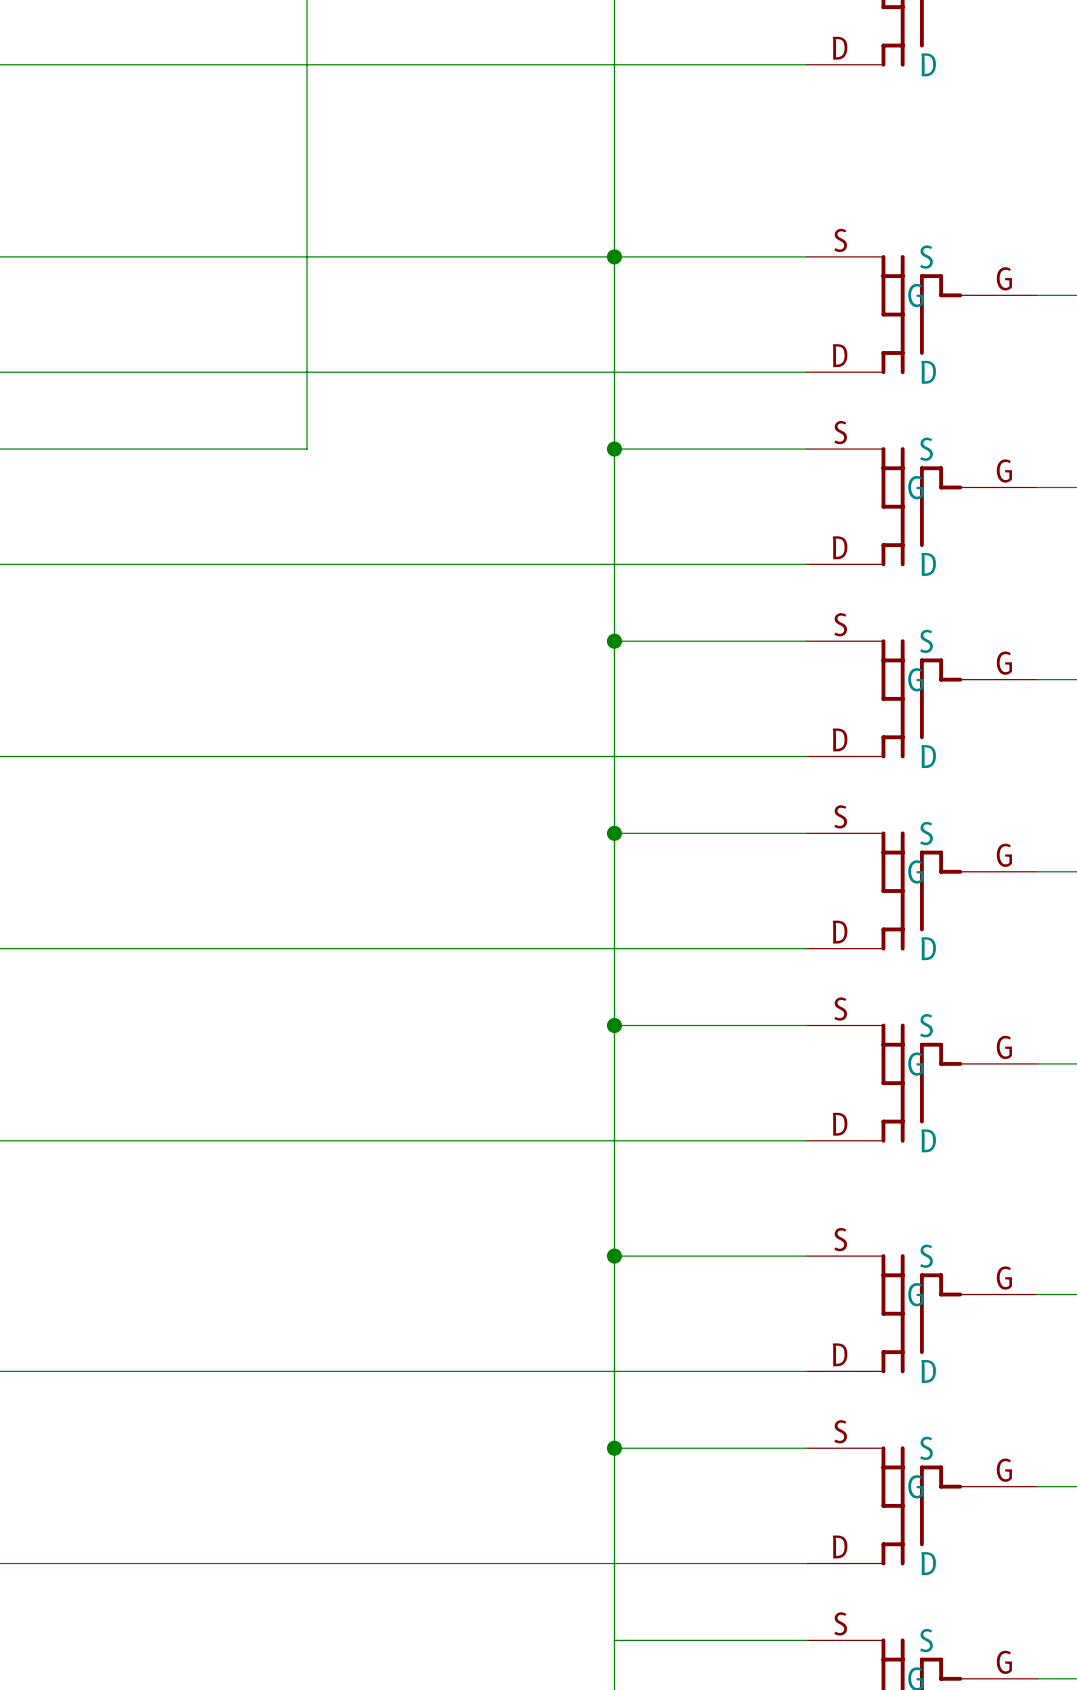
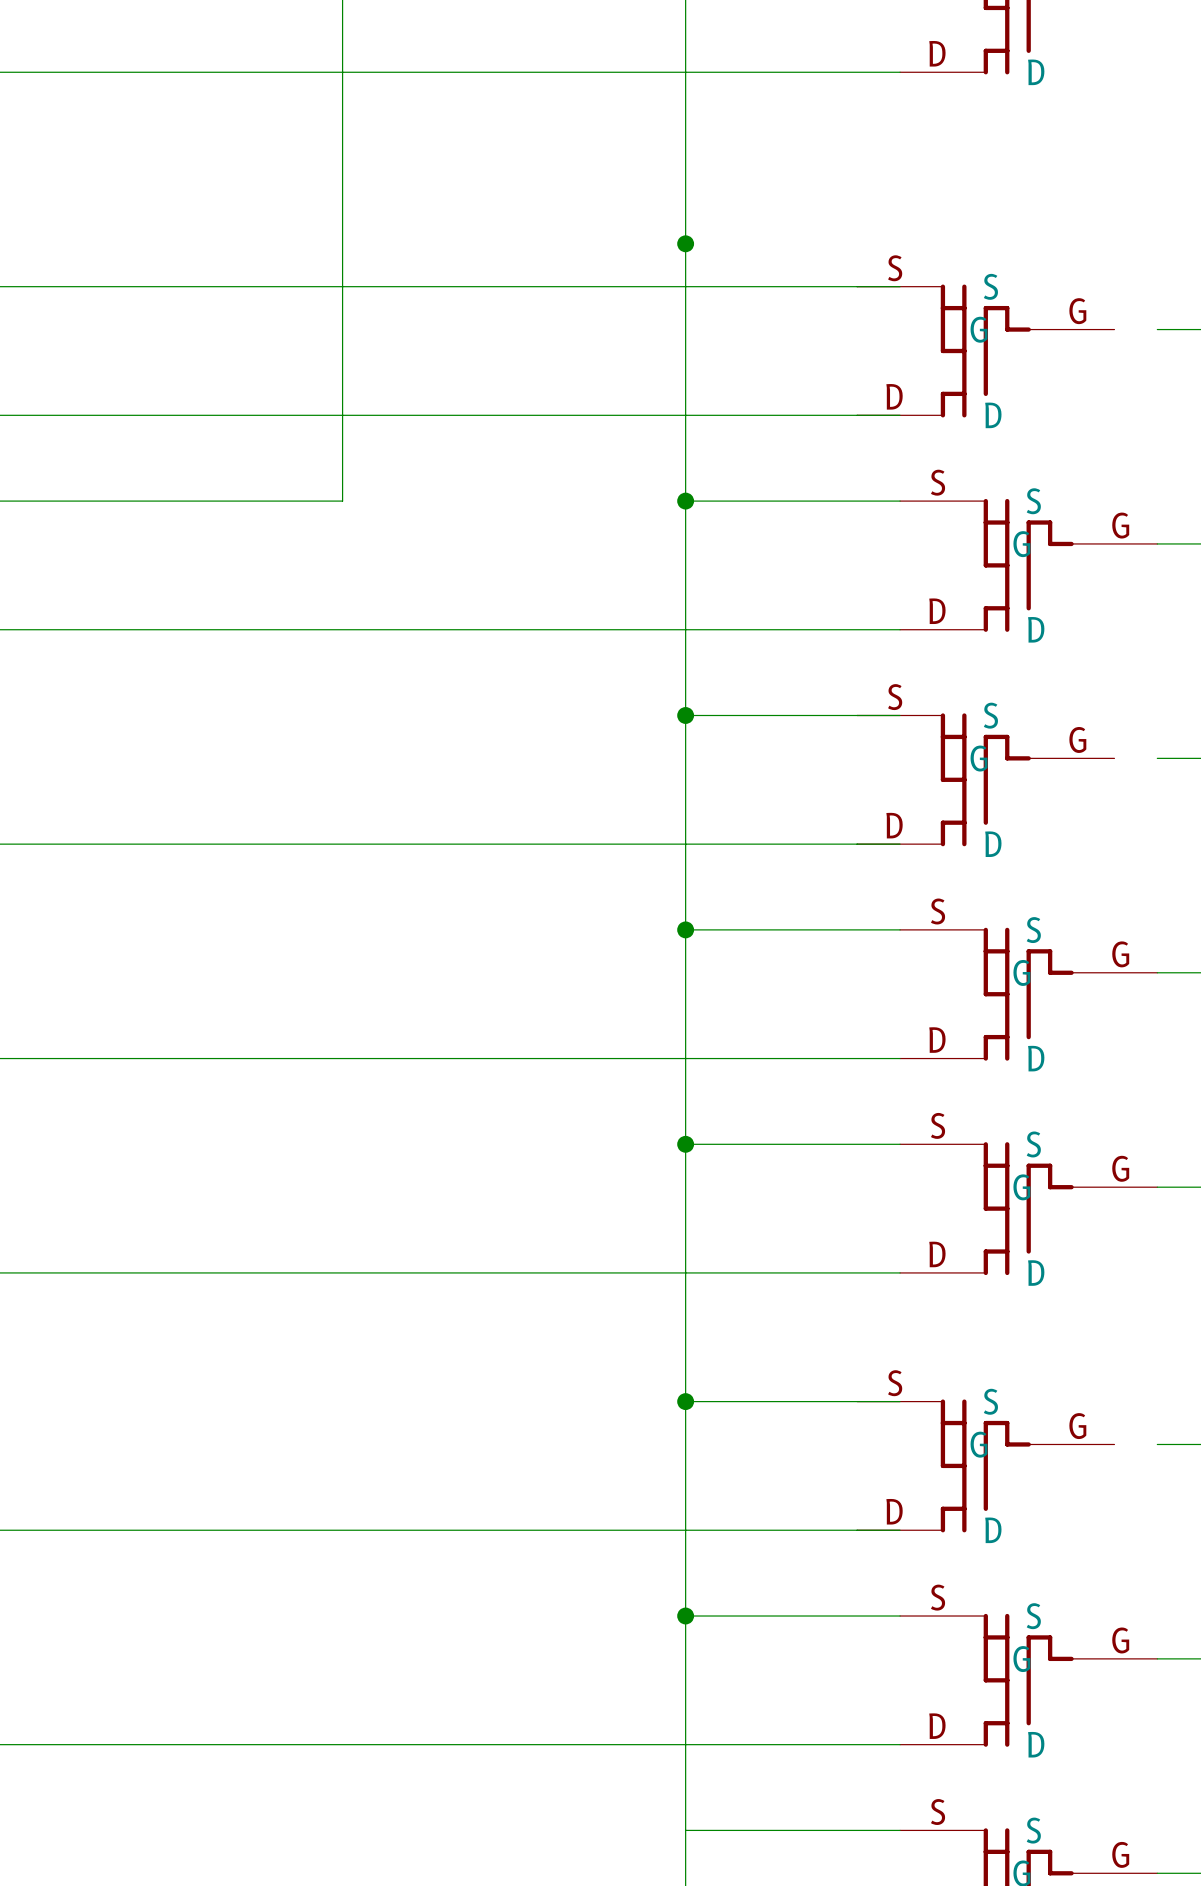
junction position: (614, 256) -> (685, 243)
part position: (921, 314) -> (985, 350)
part position: (921, 698) -> (985, 779)
part position: (921, 1313) -> (985, 1465)

